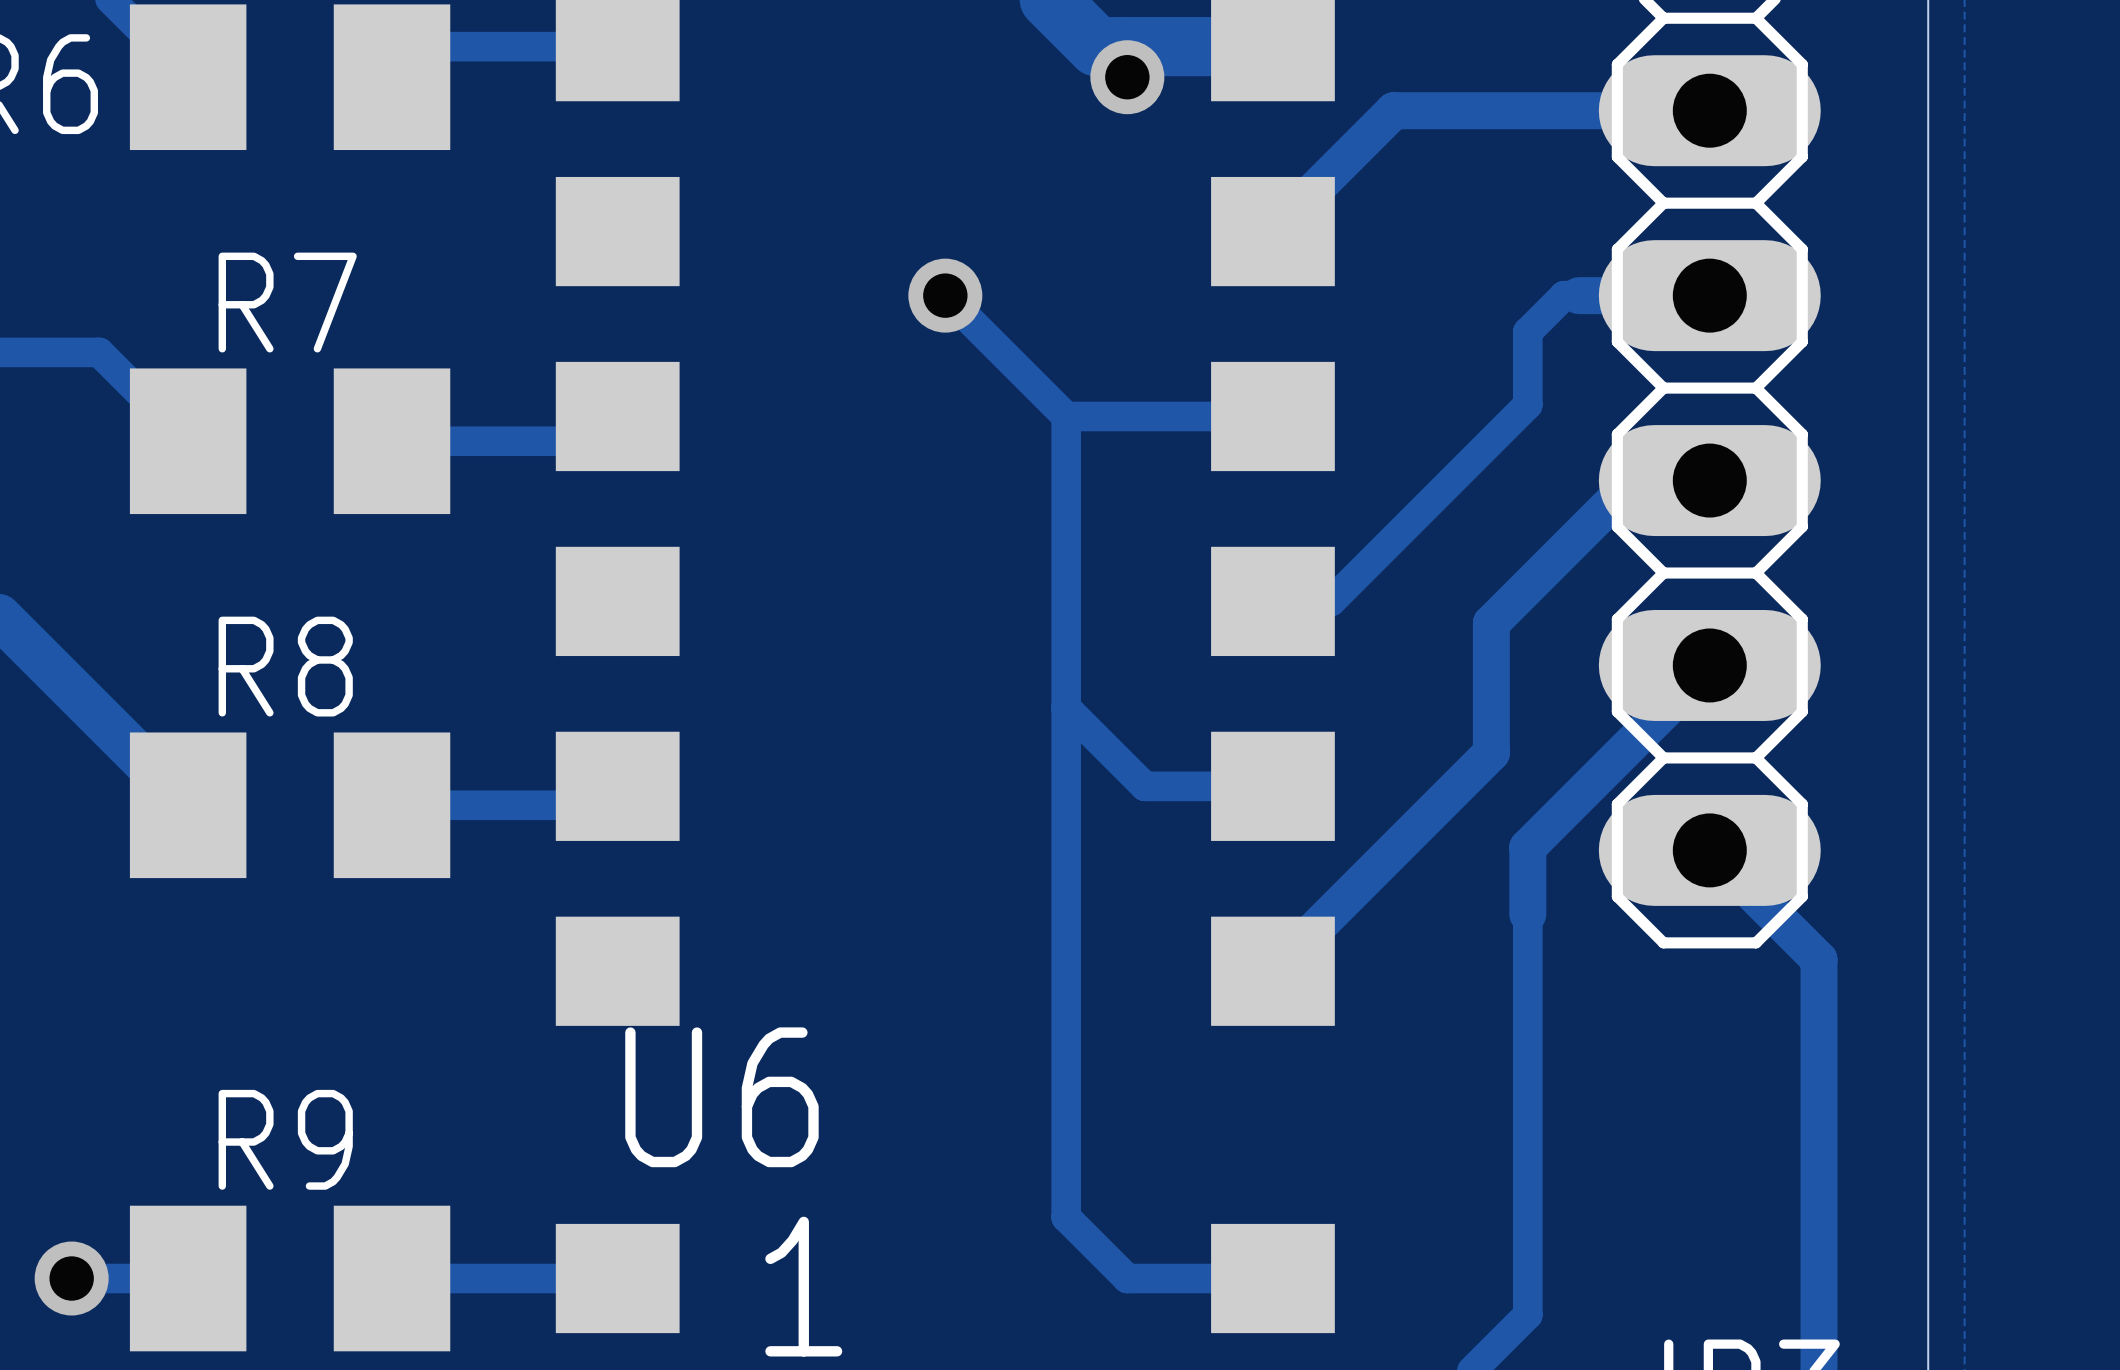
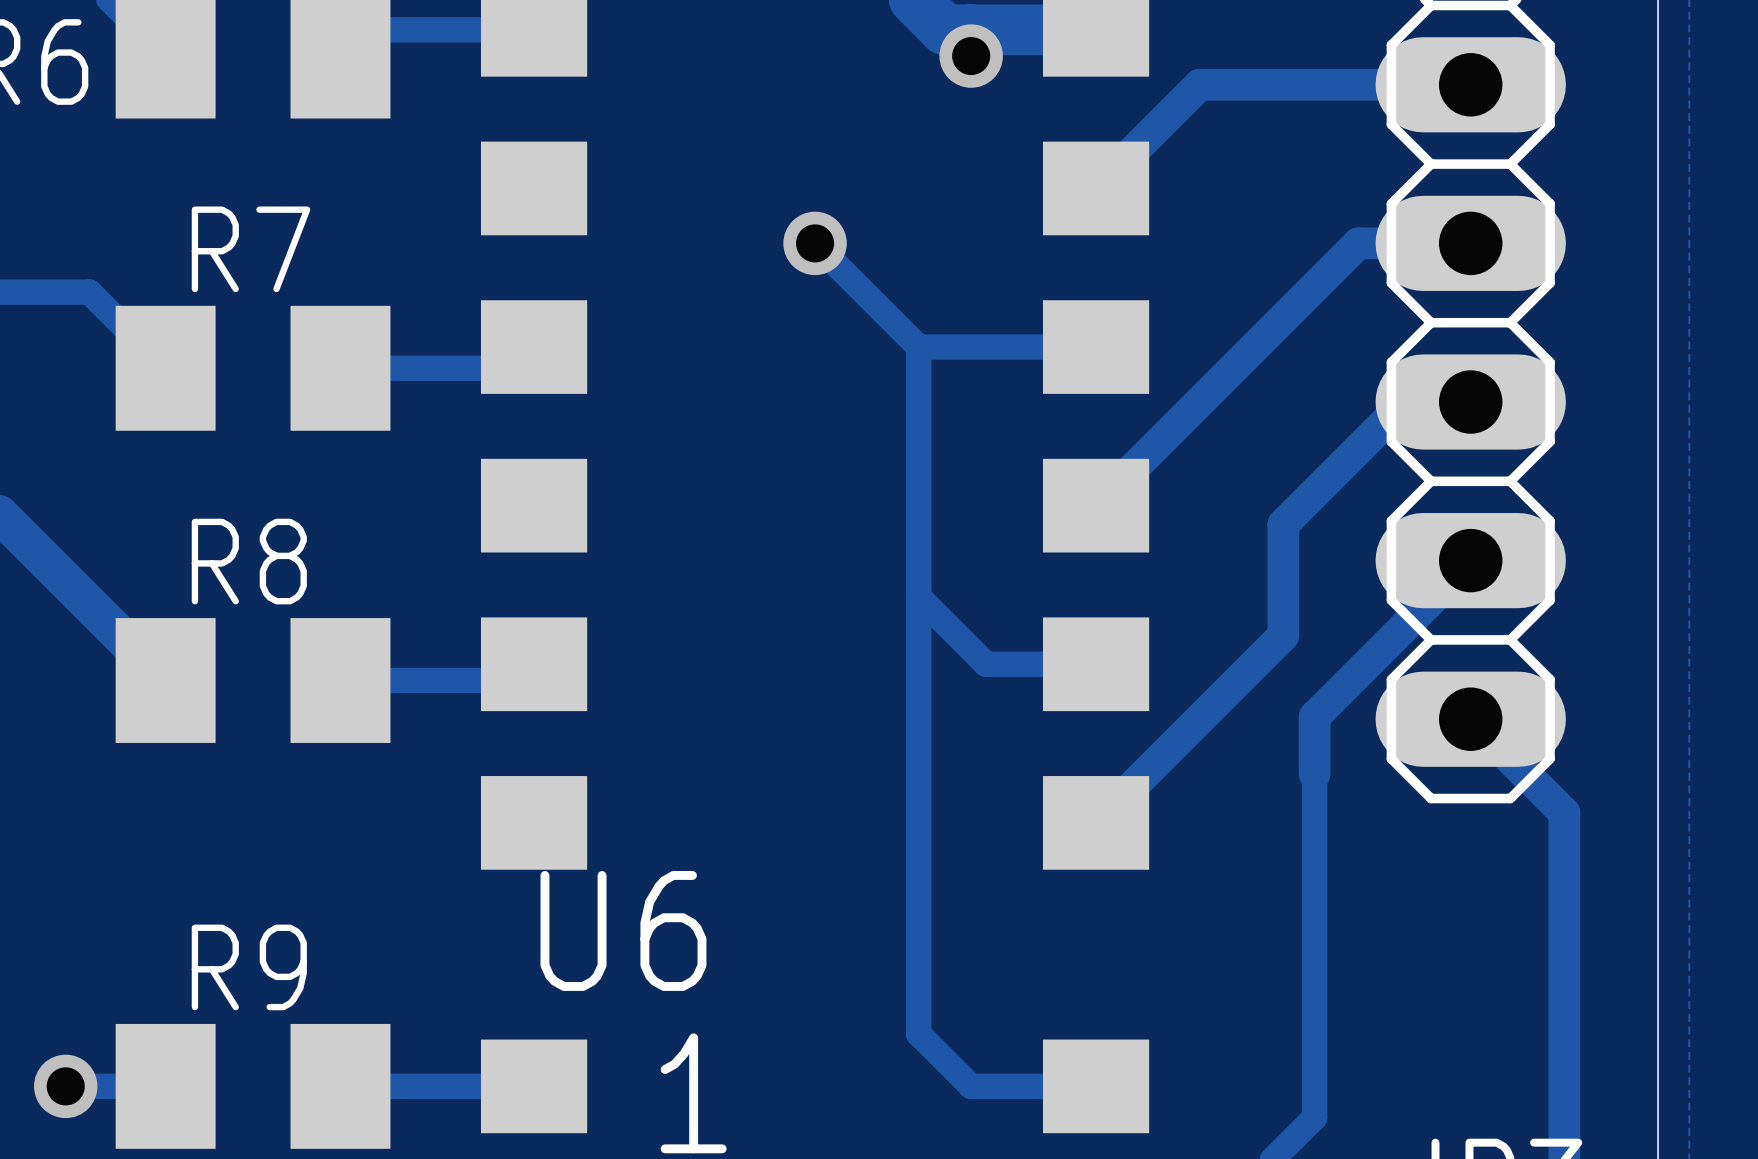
track: (1578, 295) (1564, 295) (1527, 332) (1527, 404) (1331, 601) (1272, 601) -> (1358, 243) (1096, 505)

